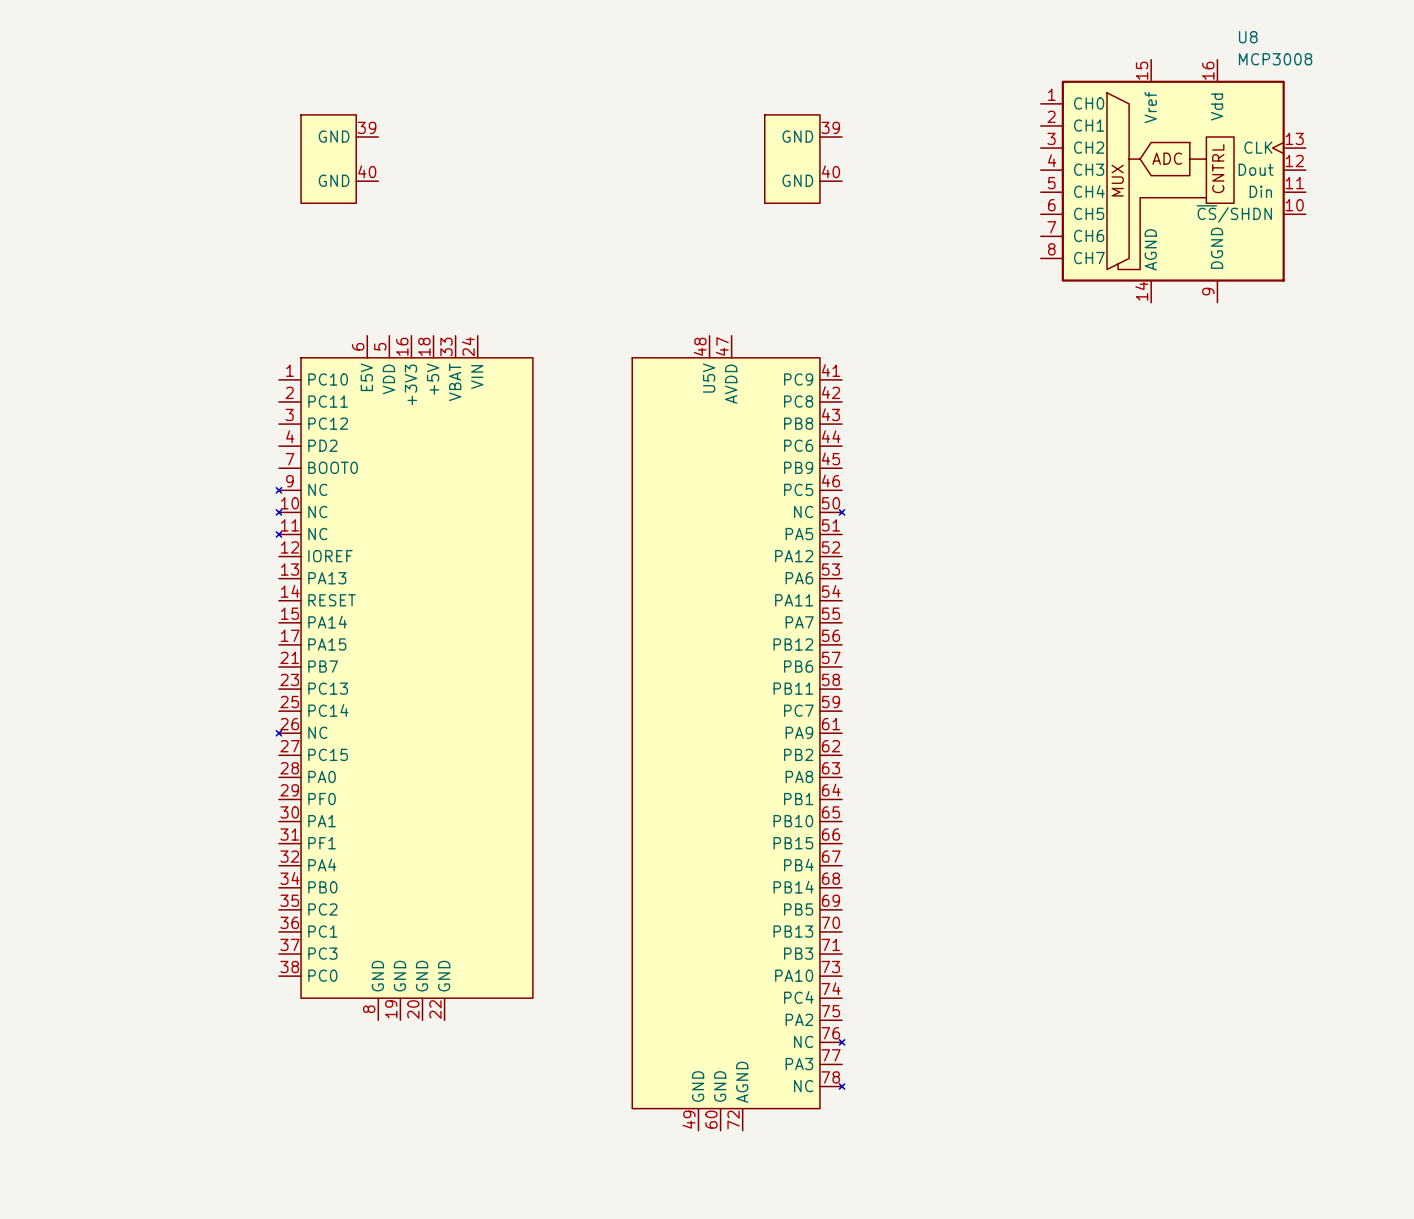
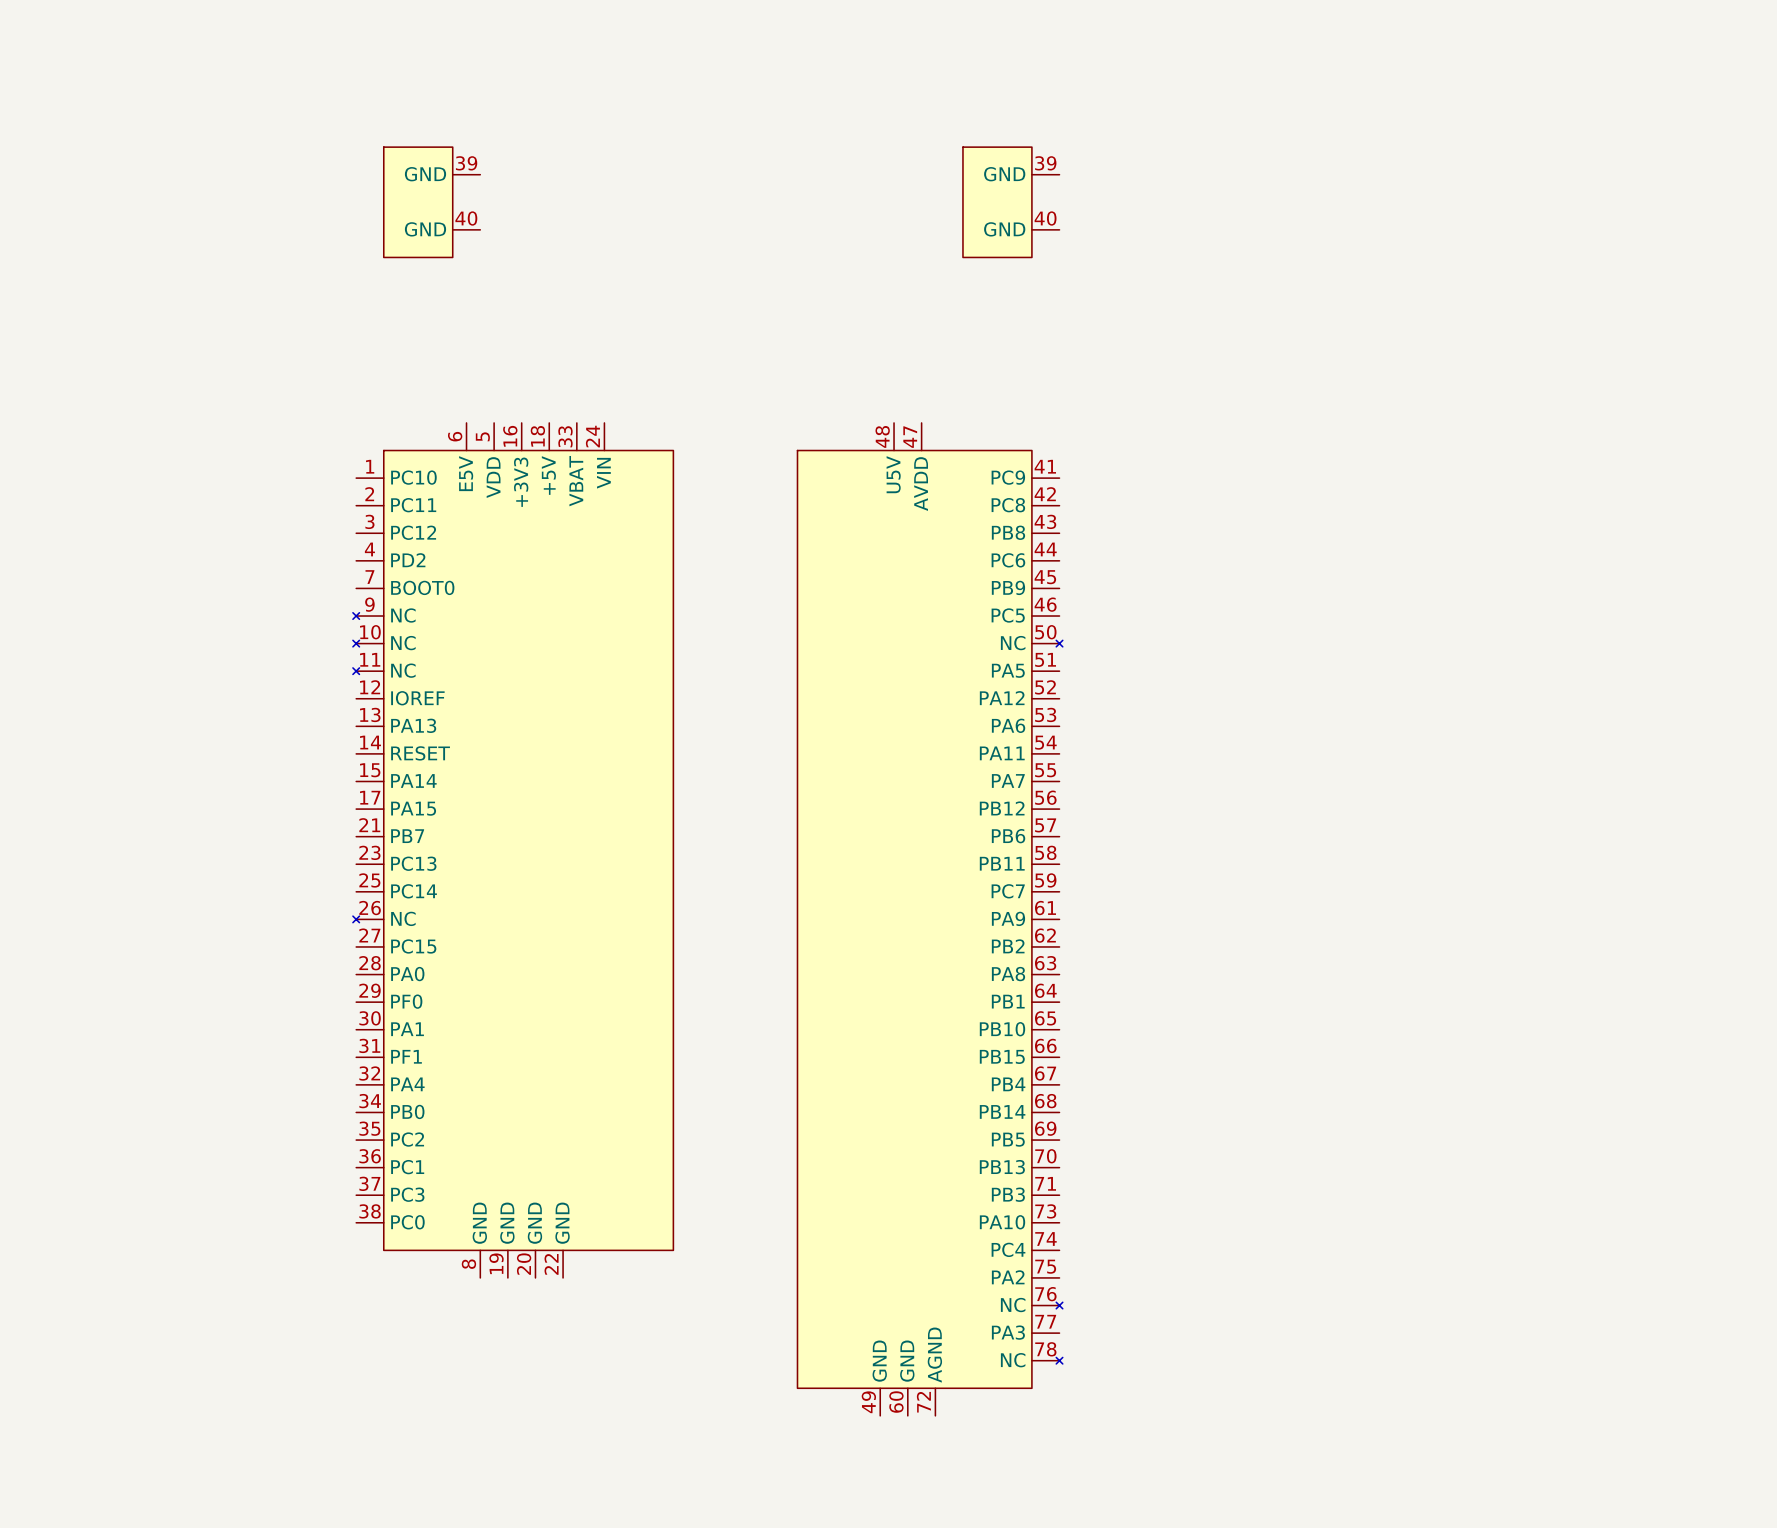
U8: MCP3008 (1173, 181) -> none

